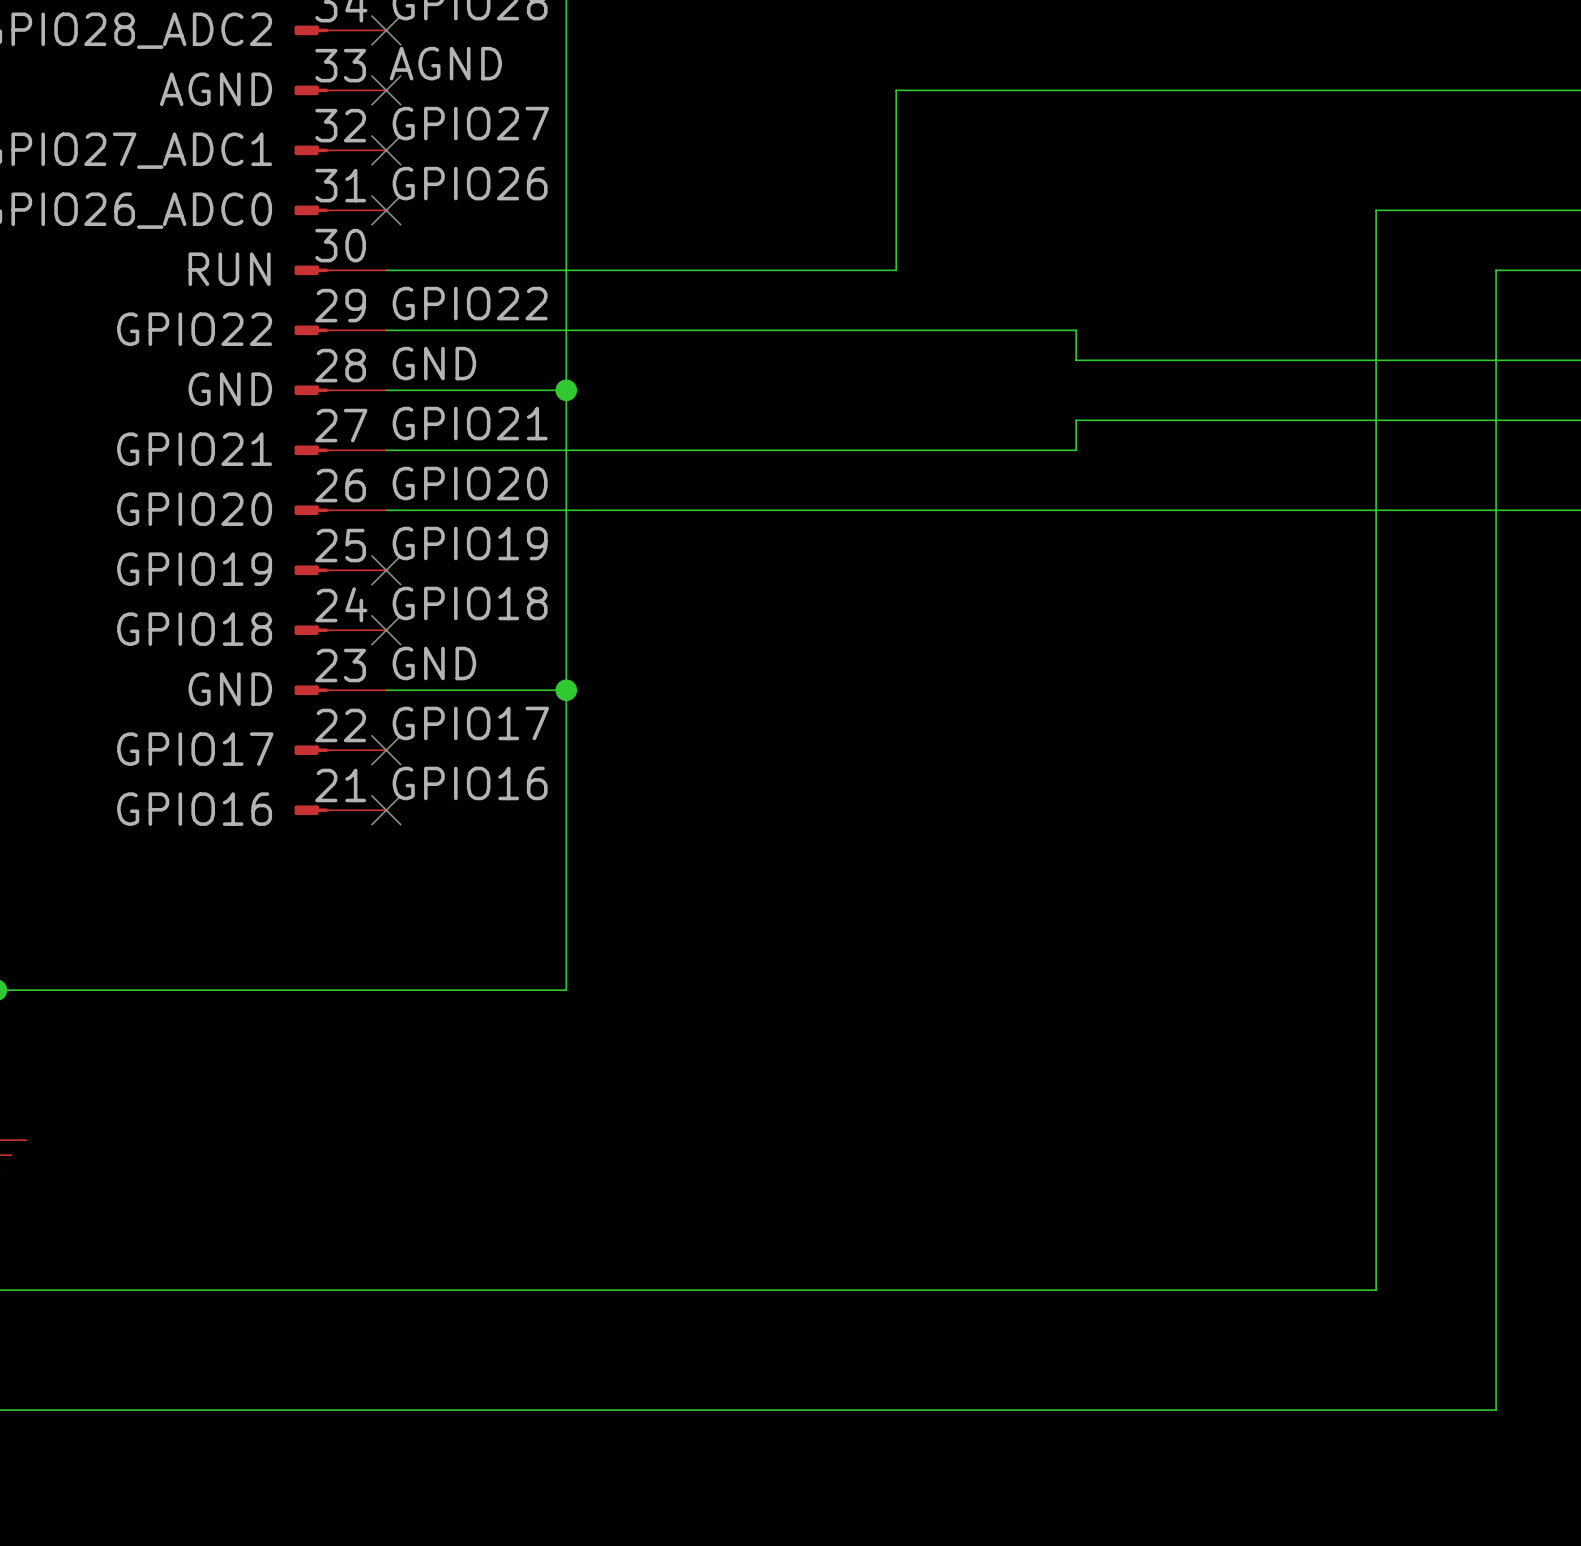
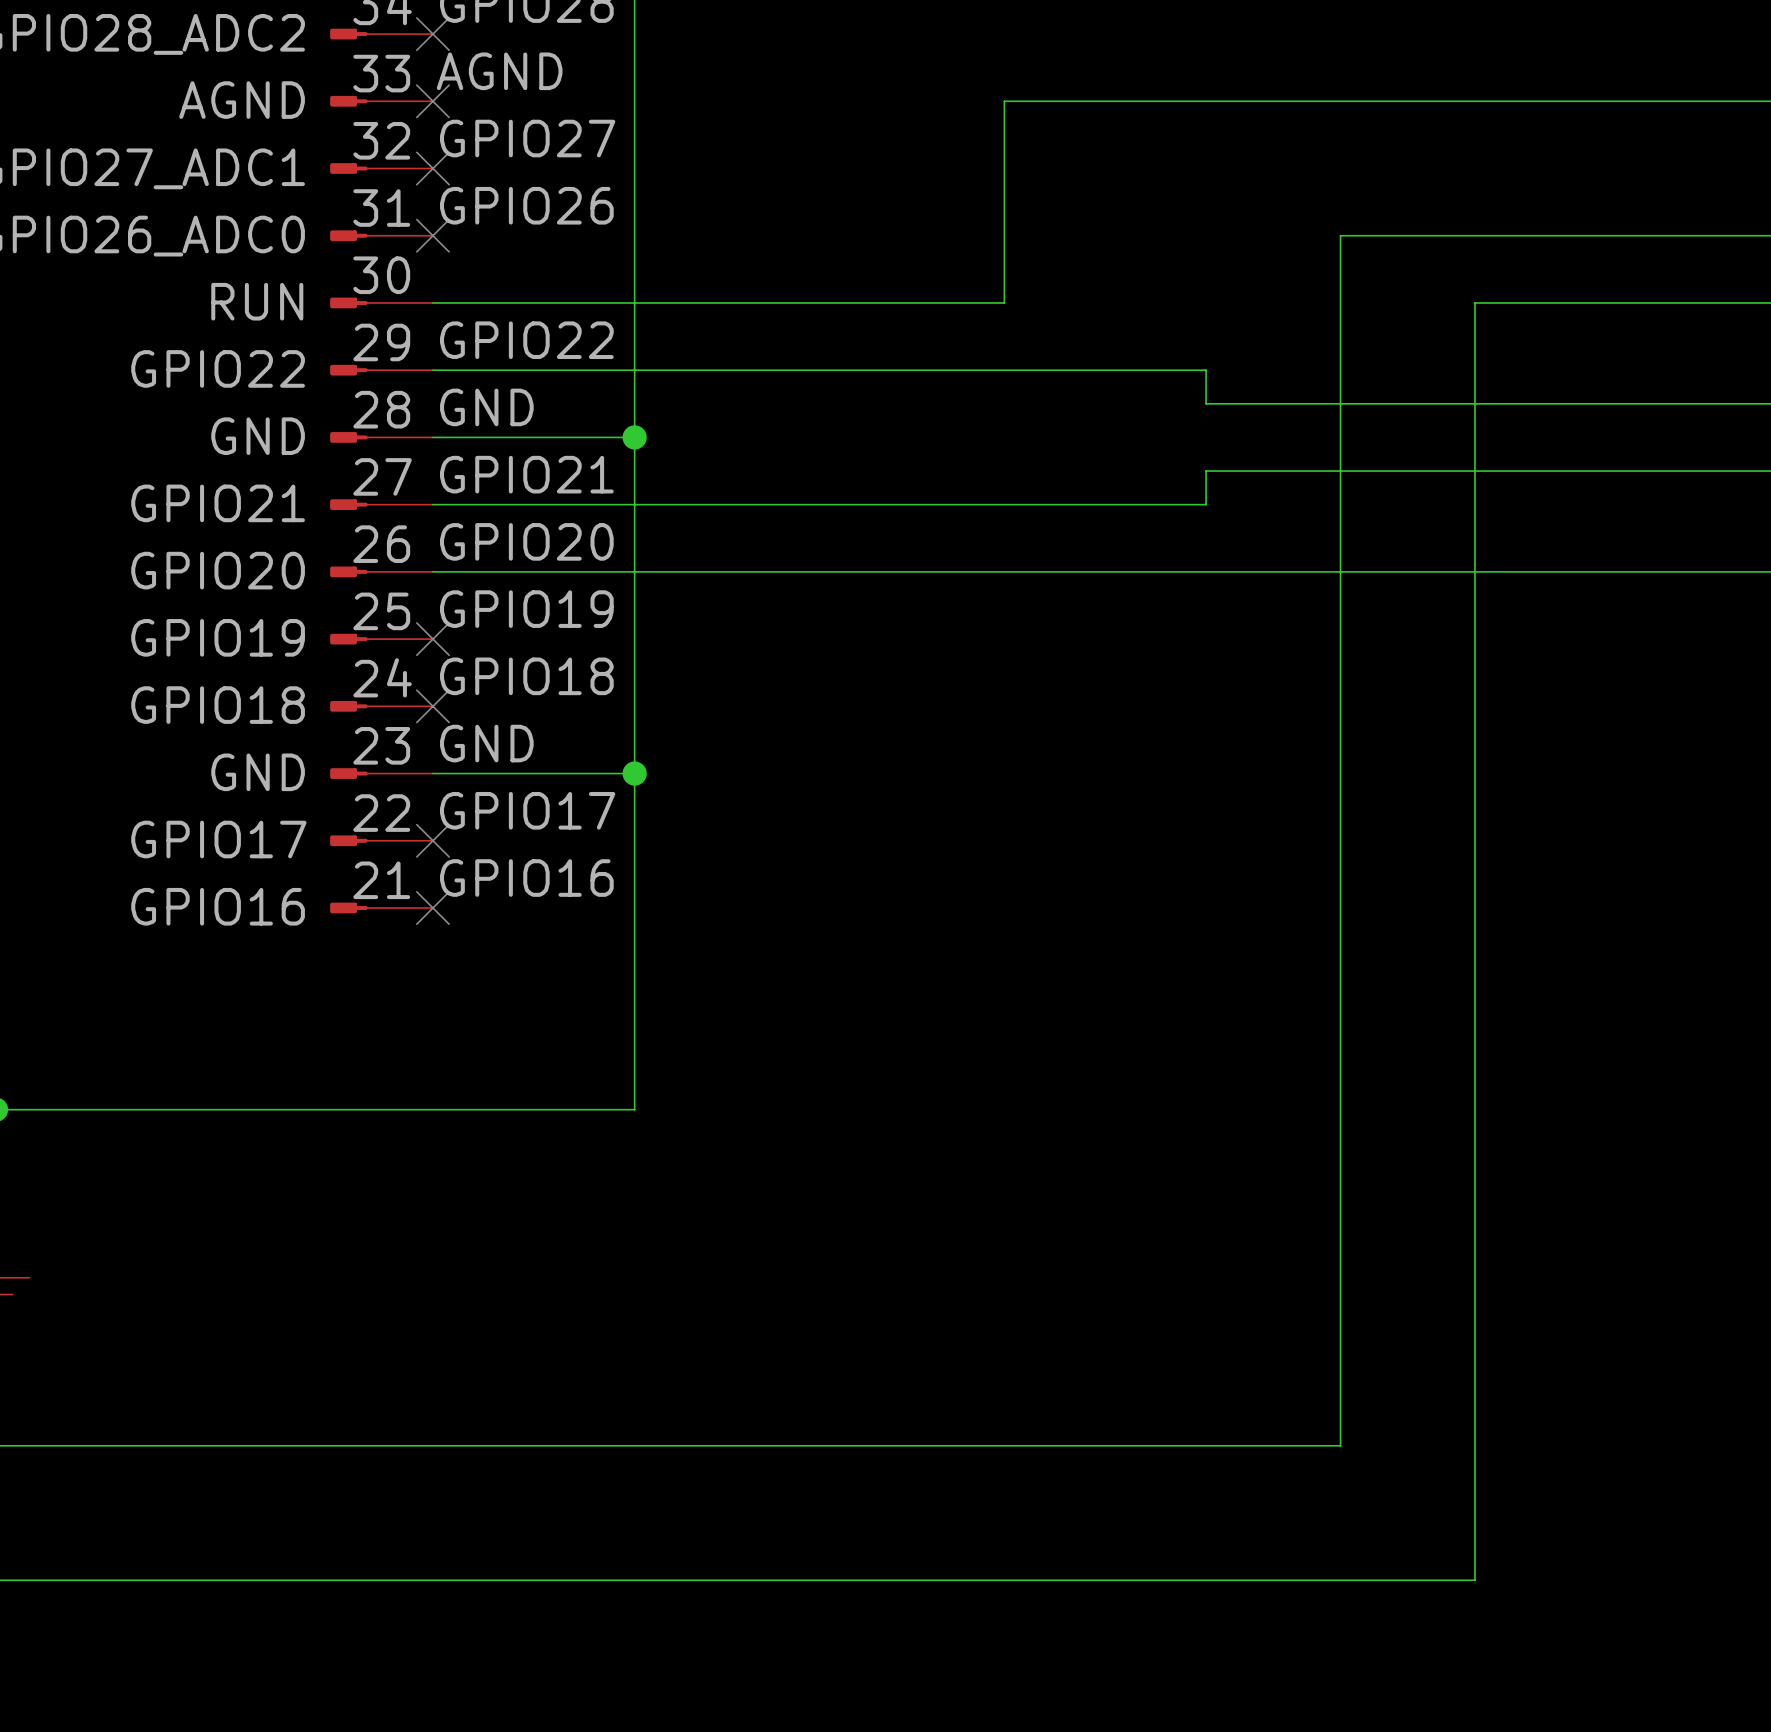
wire: (1376, 210) (1376, 1290) (1196, 1290) -> (1542, 235) (1340, 235) (1340, 1445)
wire: (1496, 270) (1496, 1410) (1316, 1410) -> (1676, 302) (1474, 302) (1474, 1580)

